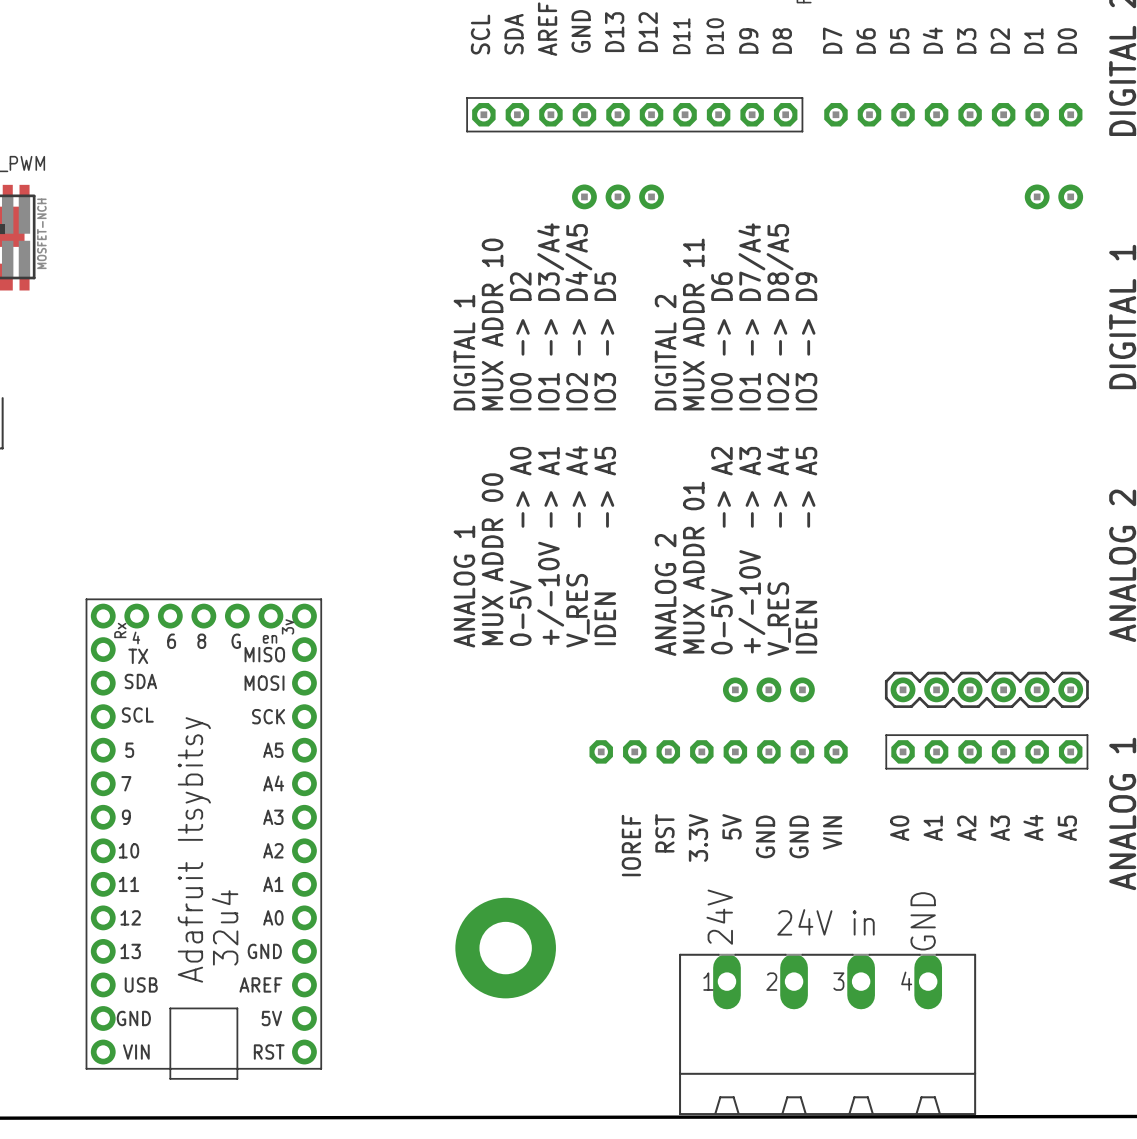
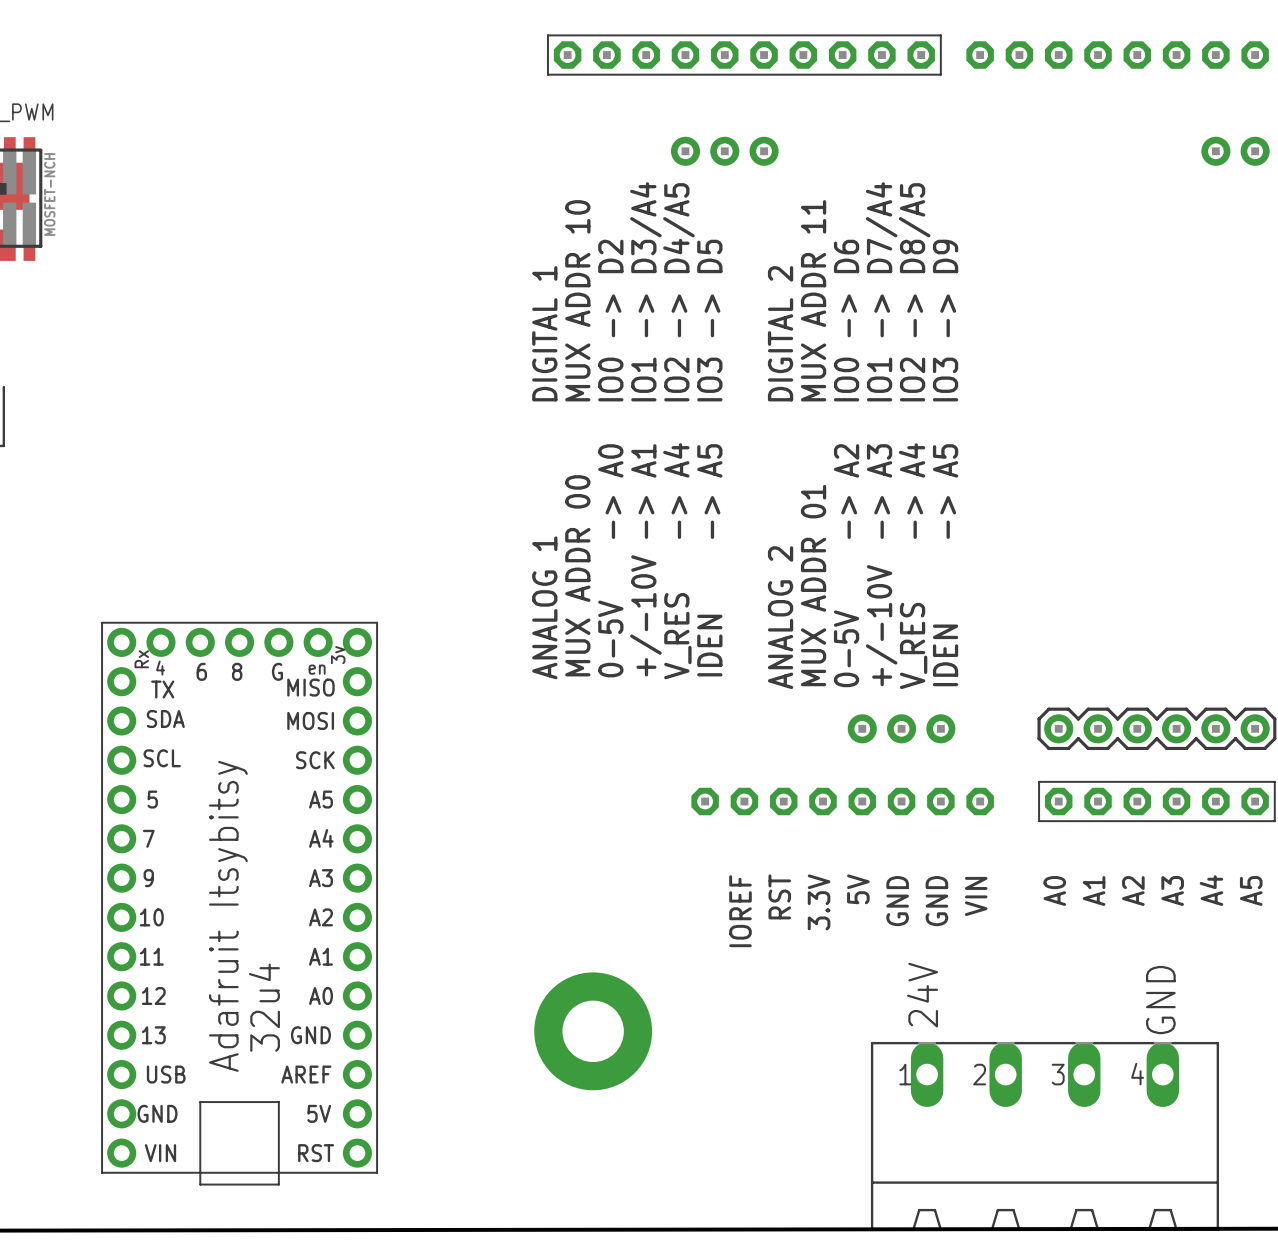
text position: 24V (719, 917) -> 24V (922, 995)
text position: GND (923, 921) -> GND (1160, 1000)
text: 24V in (825, 922) -> none
part position: (827, 1034) -> (1044, 1136)

